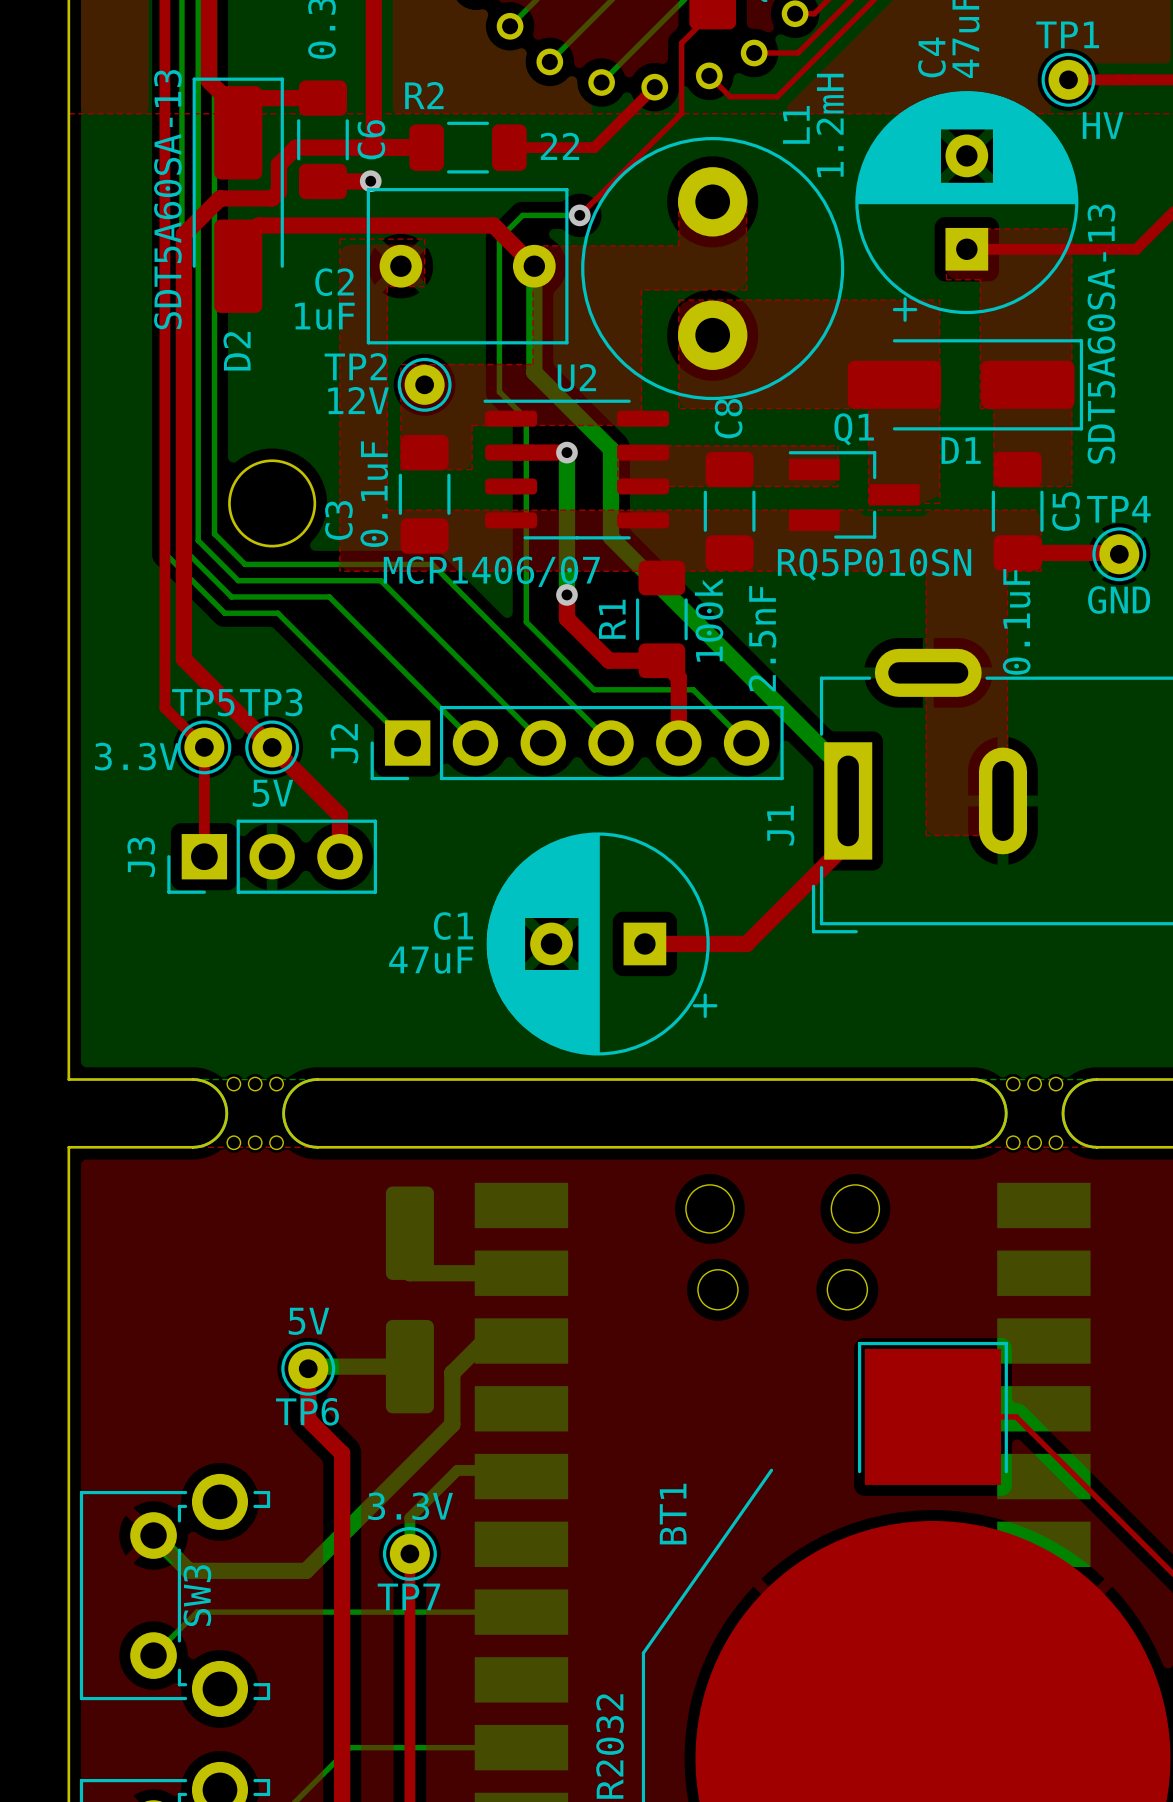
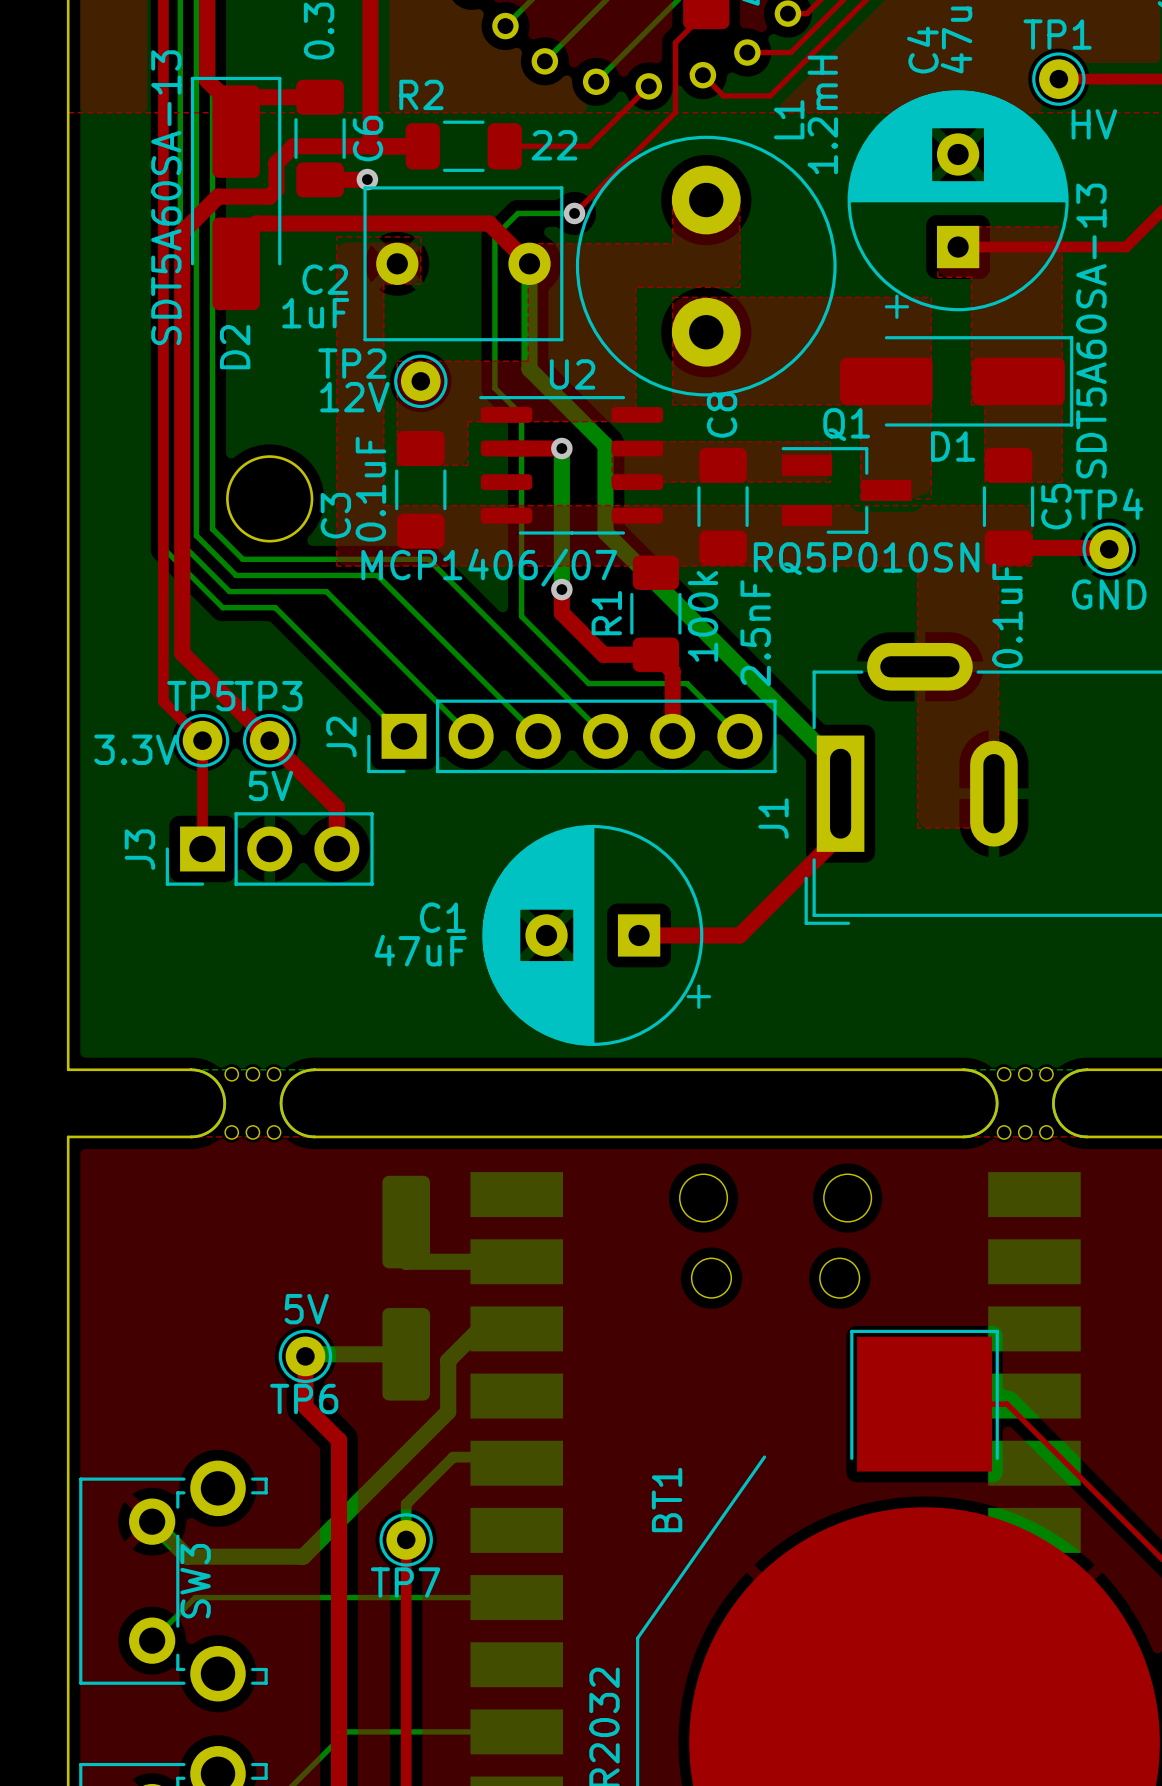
top track width: thick (654, 87) (594, 147) (509, 147) -> thin (648, 86) (588, 146) (504, 146)
TP7 value: 3.3V (410, 1506) -> none

